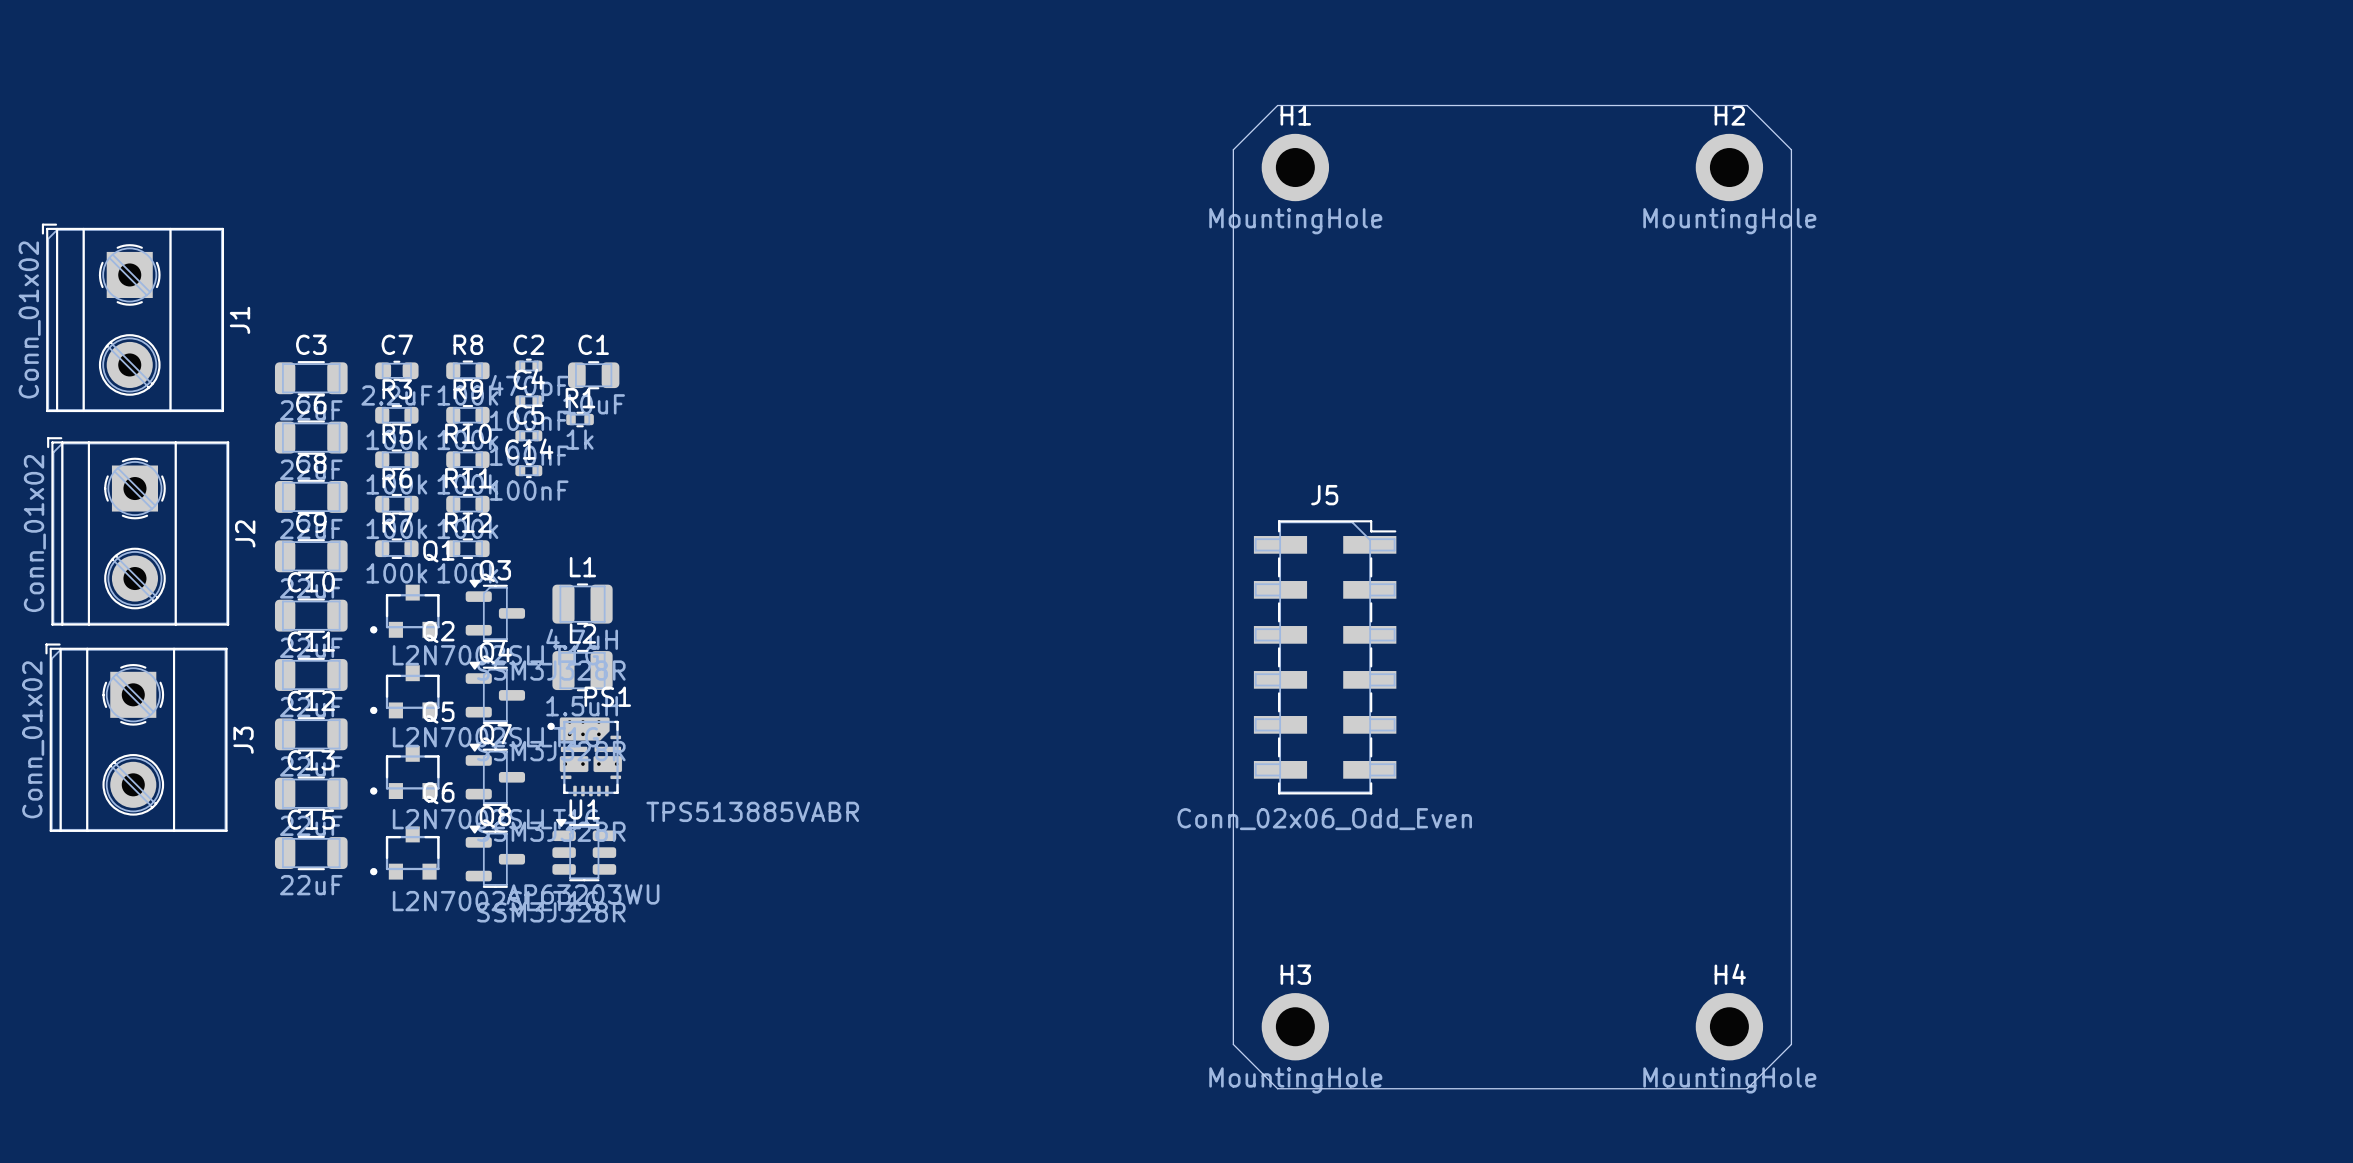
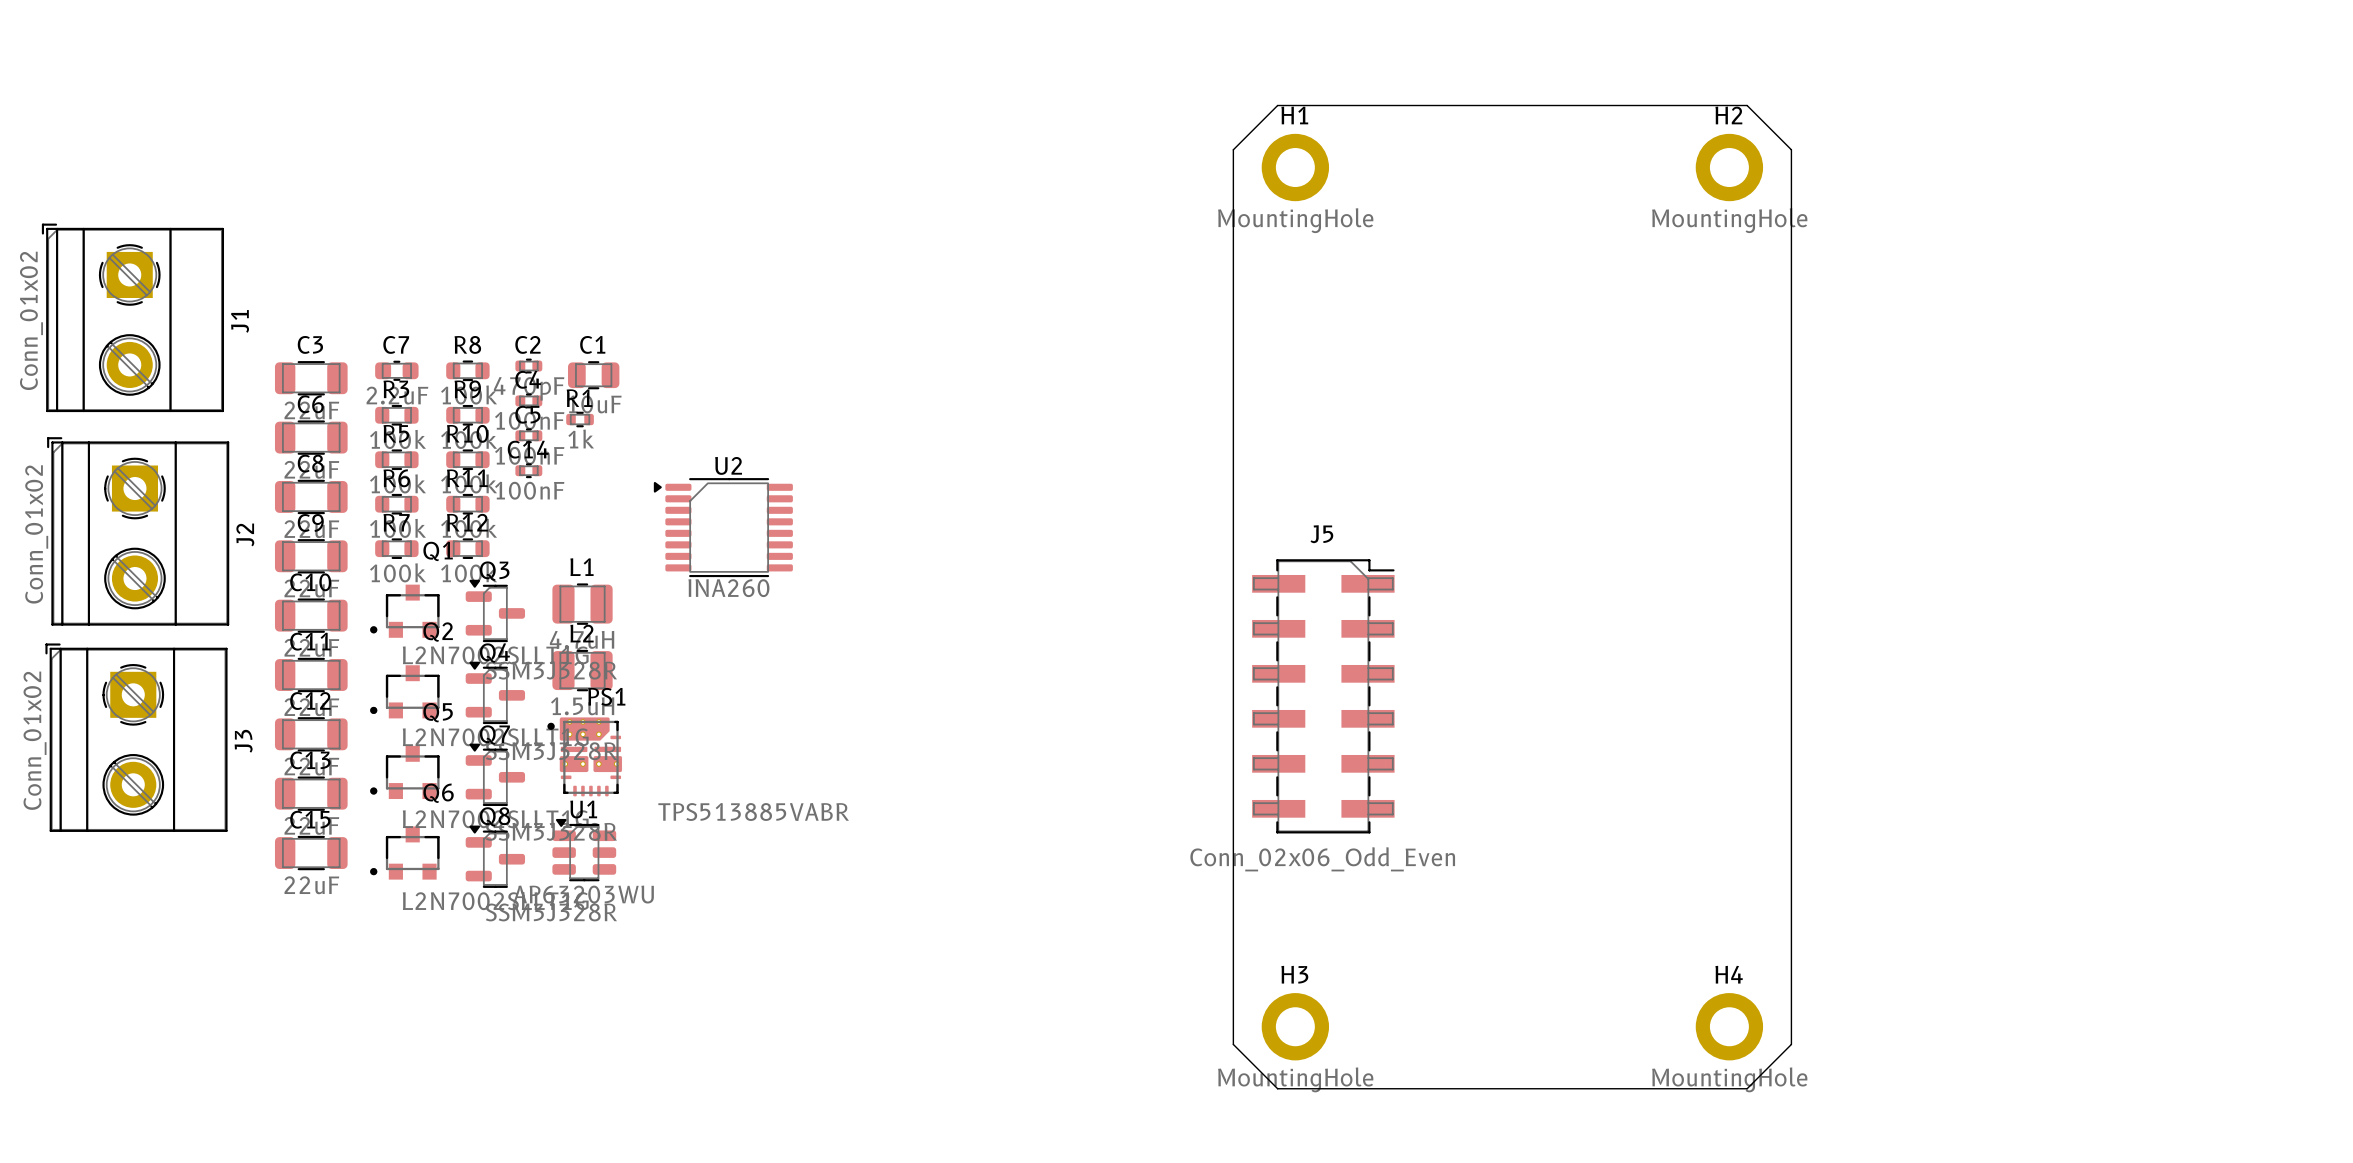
U2: none -> INA260 (723, 527)
J5 position: (1325, 657) -> (1323, 696)

